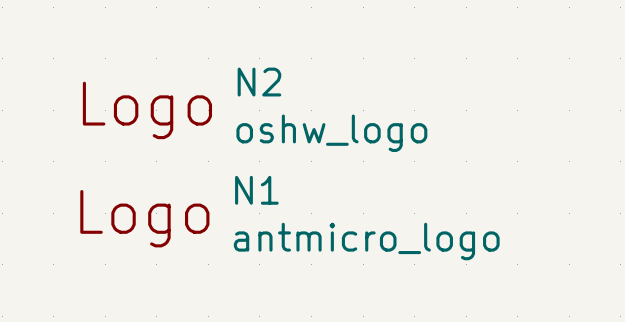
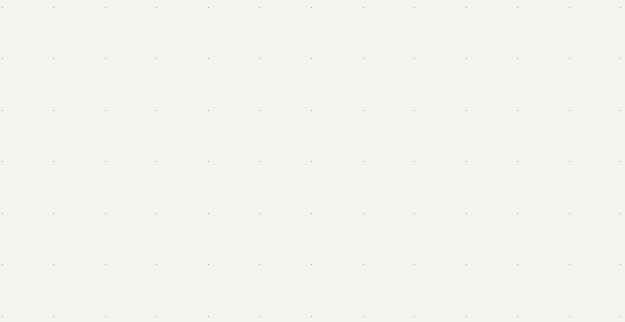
N2: oshw_logo (255, 109) -> none
N1: antmicro_logo (289, 218) -> none

